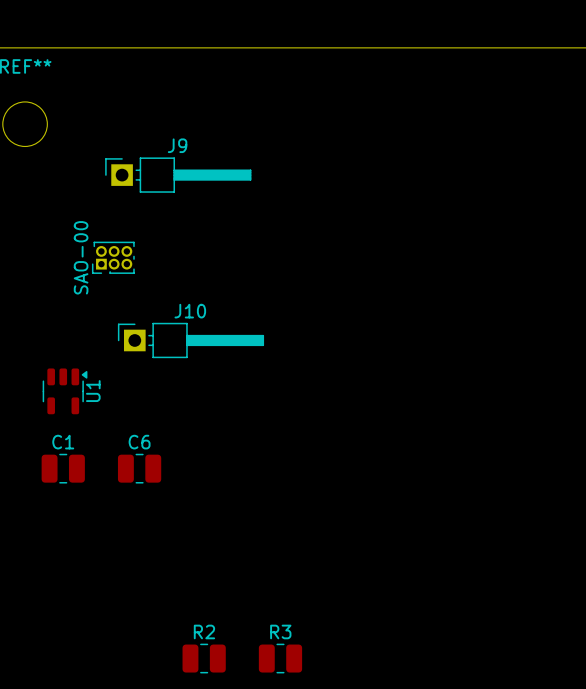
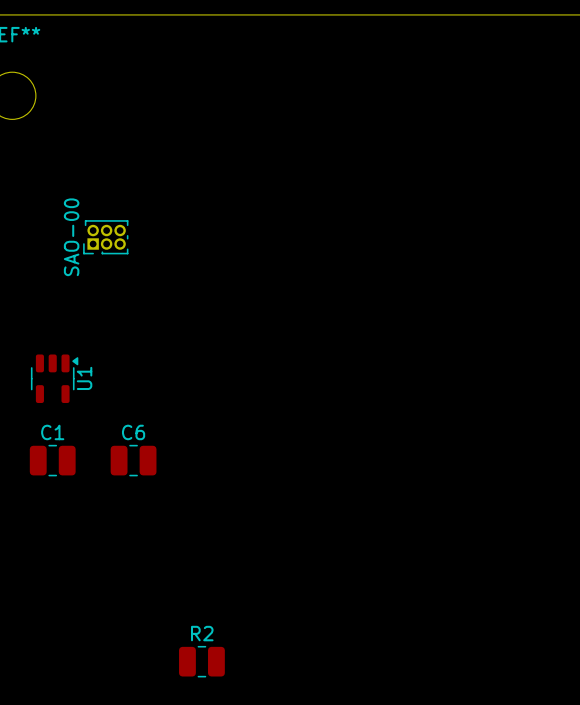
J9: (178, 175) -> none
J10: (190, 340) -> none
R3: (280, 658) -> none

